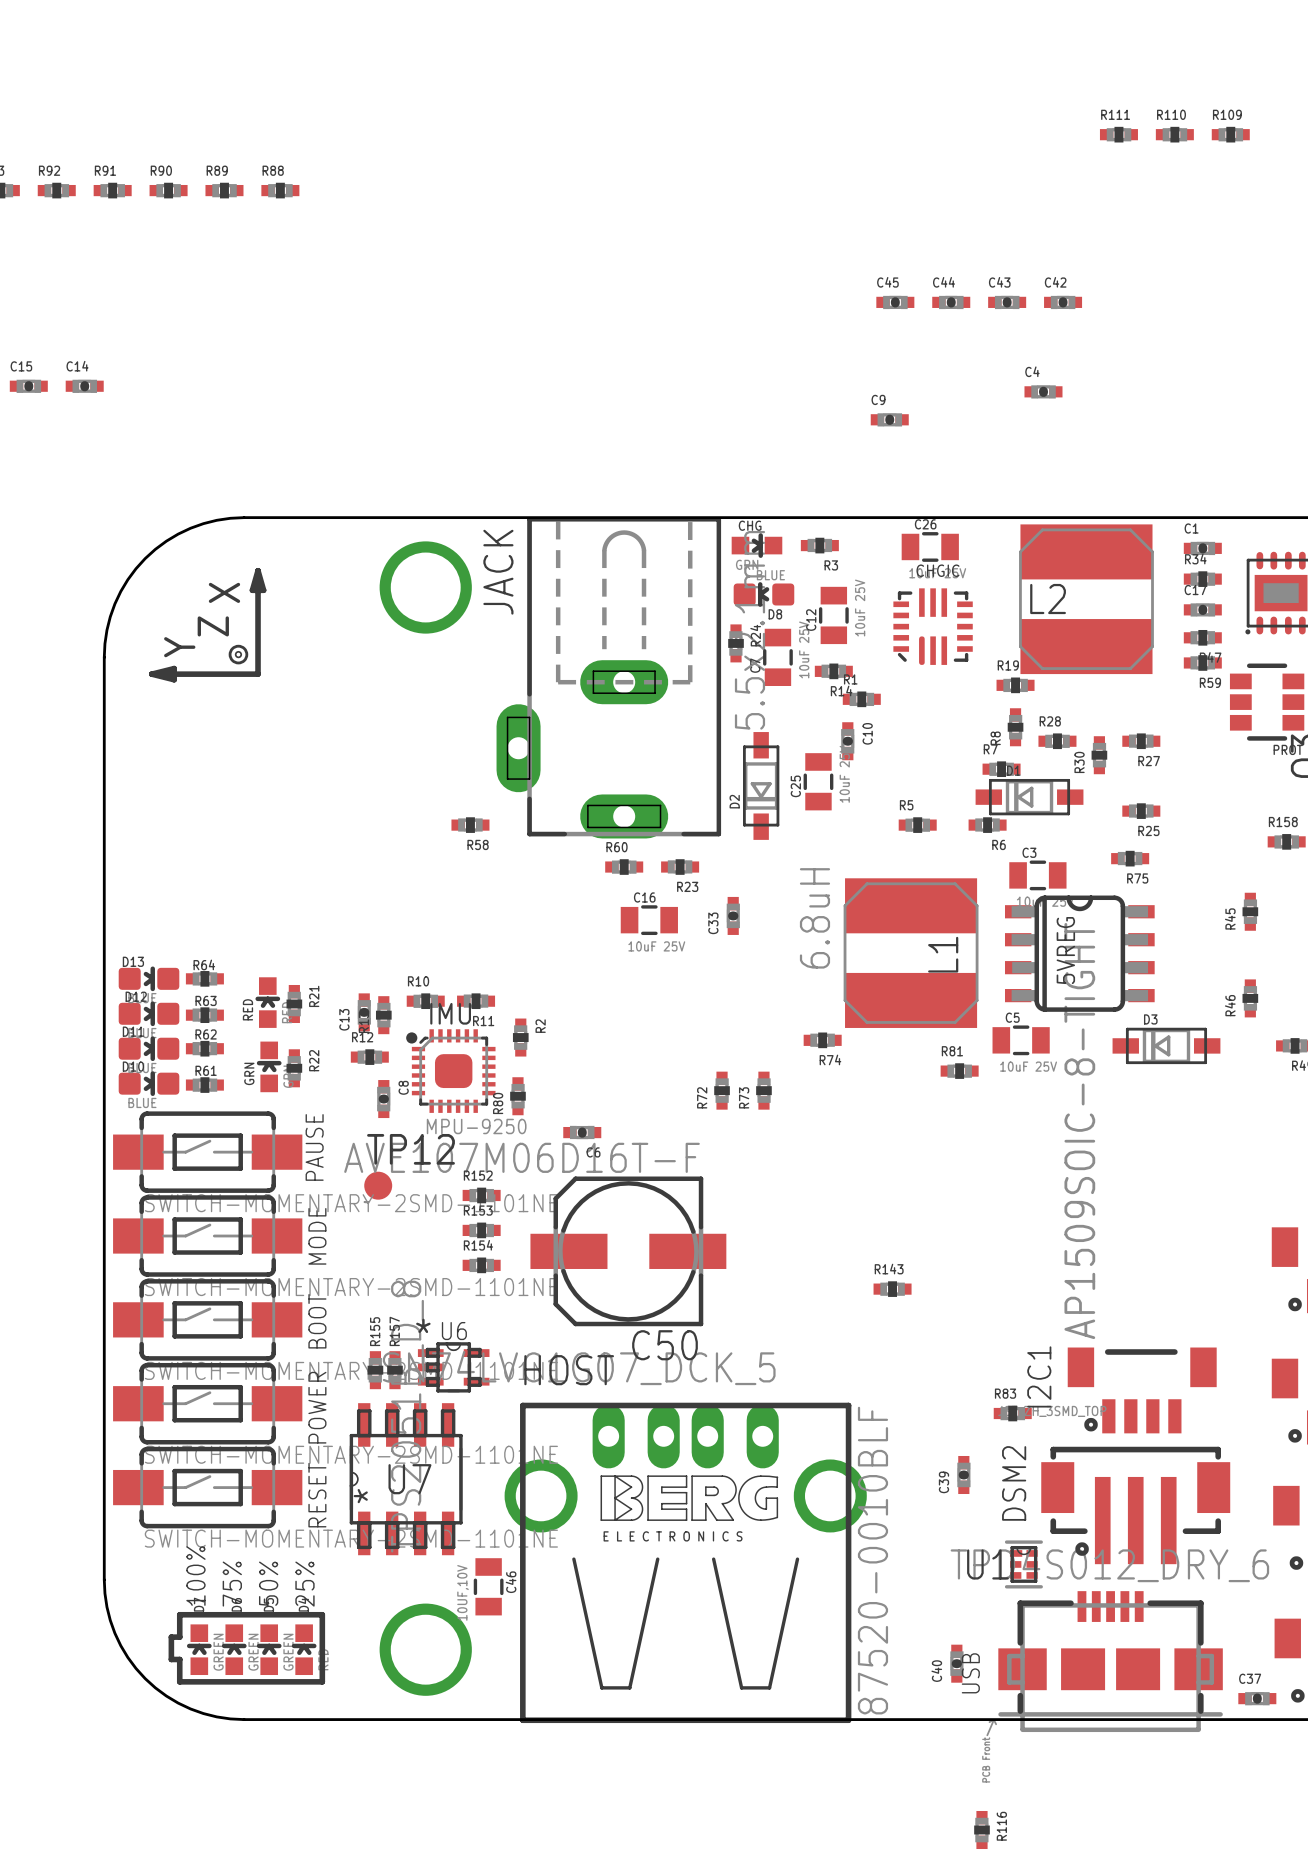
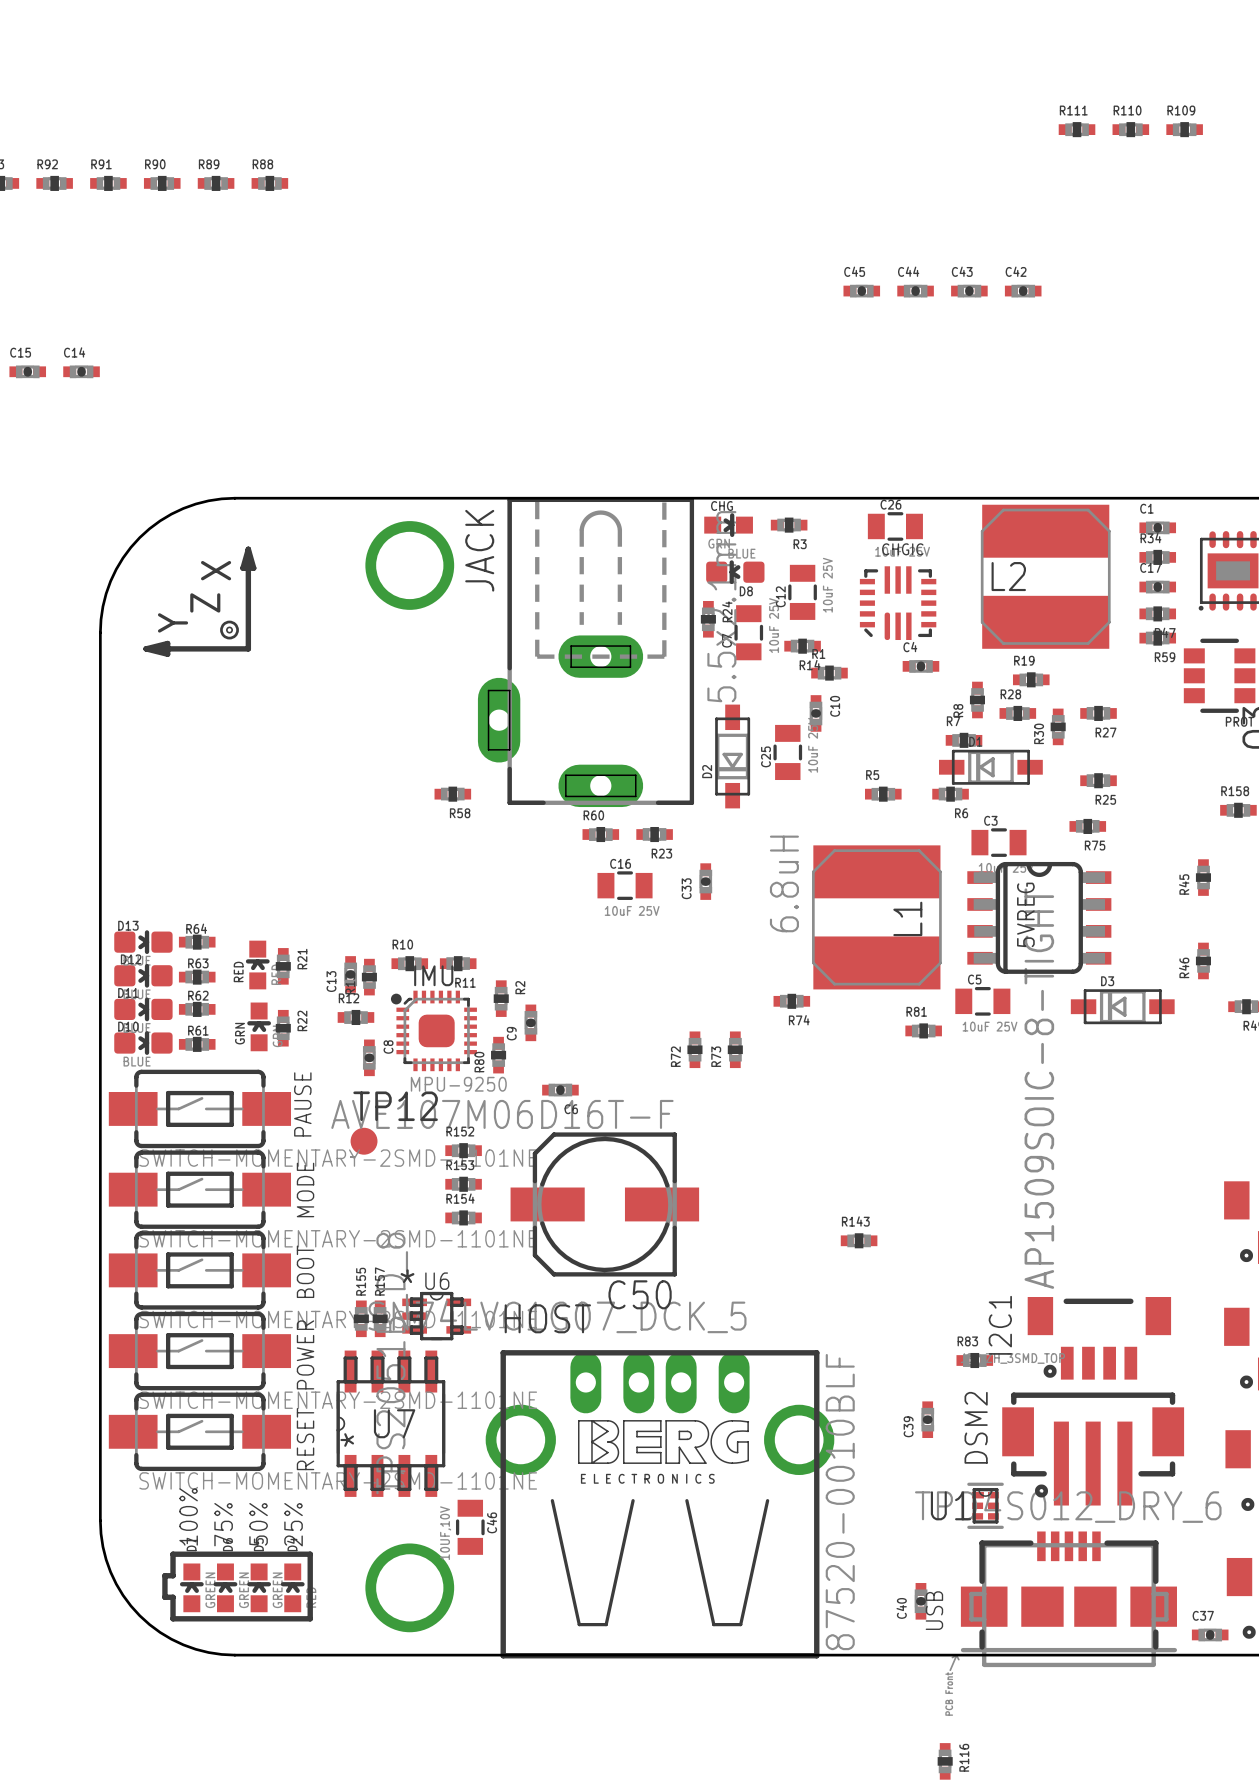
C4 position: (1043, 391) -> (920, 666)
C9 rotation: 0° (889, 419) -> 90° clockwise (530, 1022)
C9 position: (889, 419) -> (530, 1022)
R19 position: (1015, 685) -> (1031, 679)

